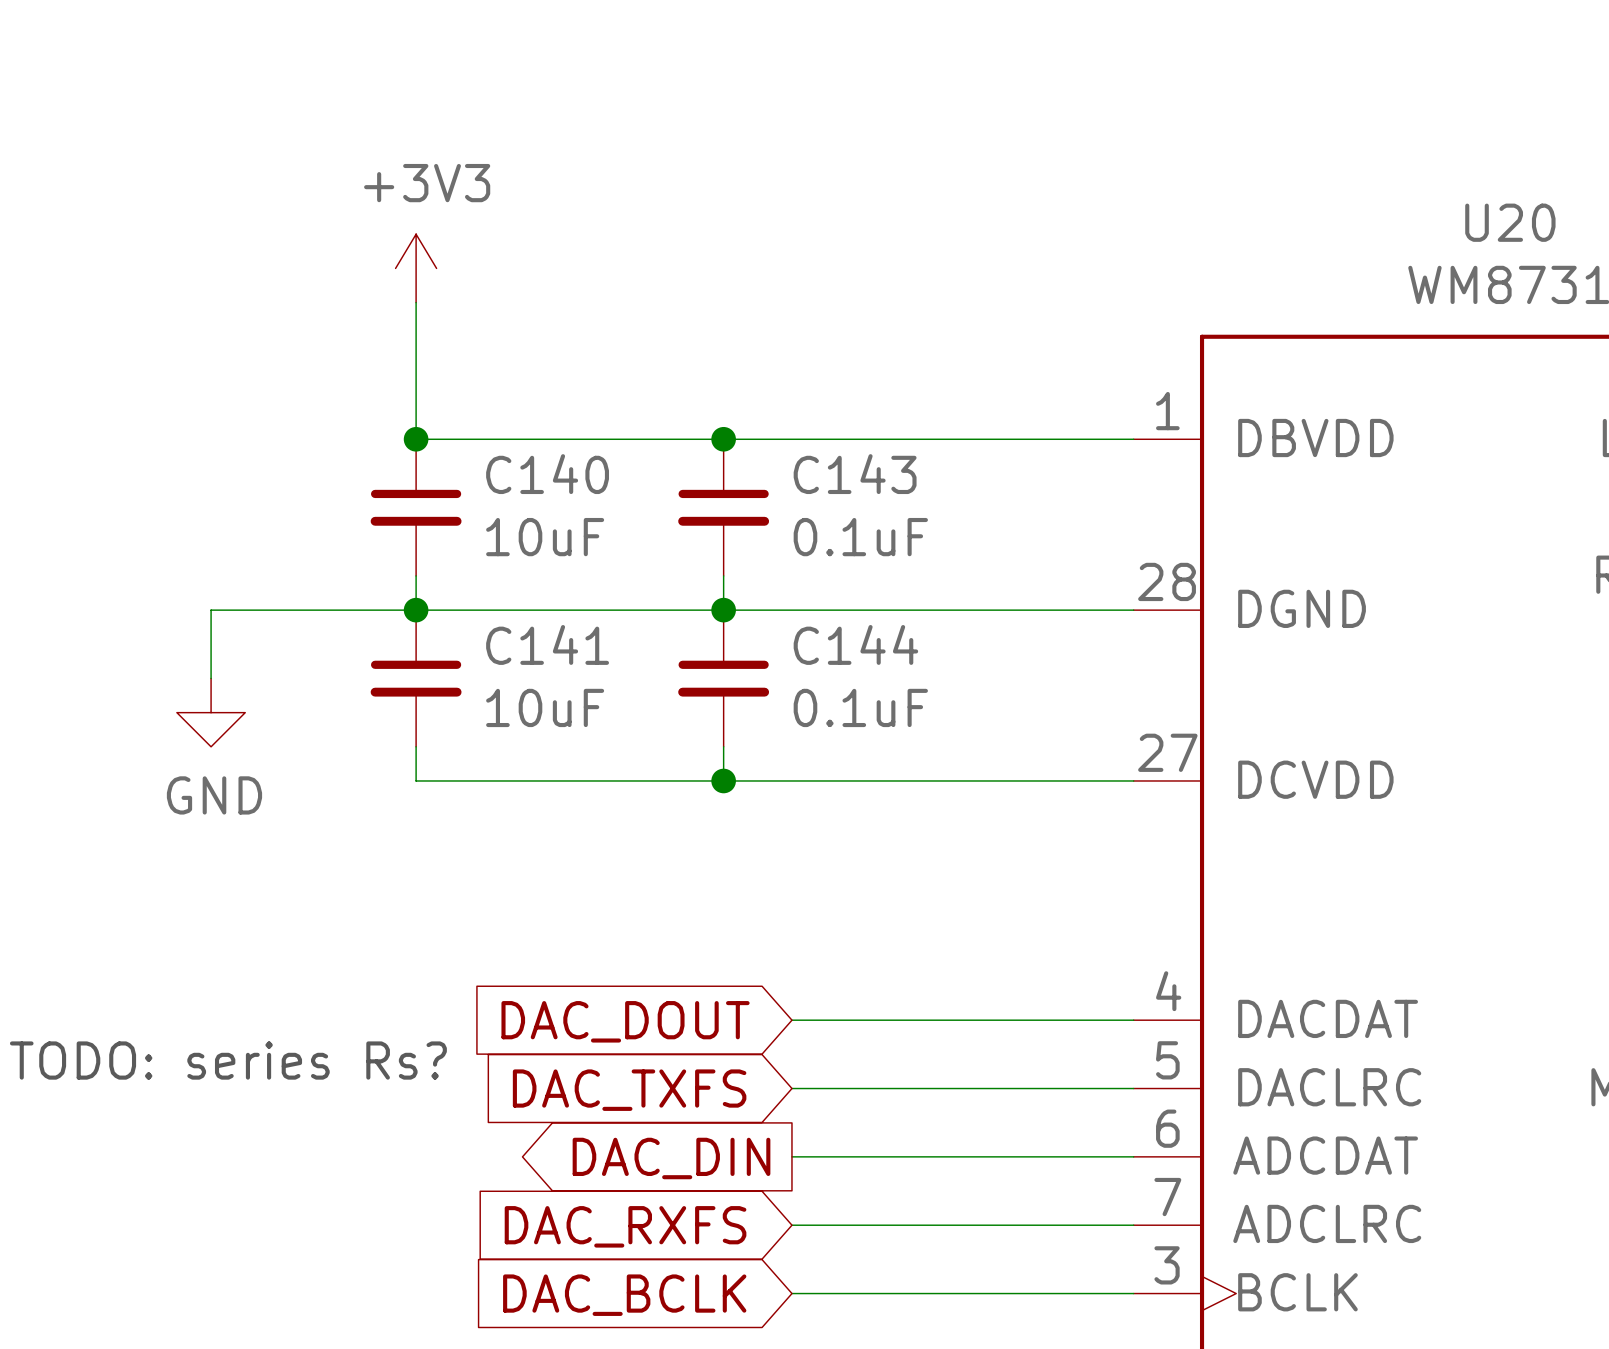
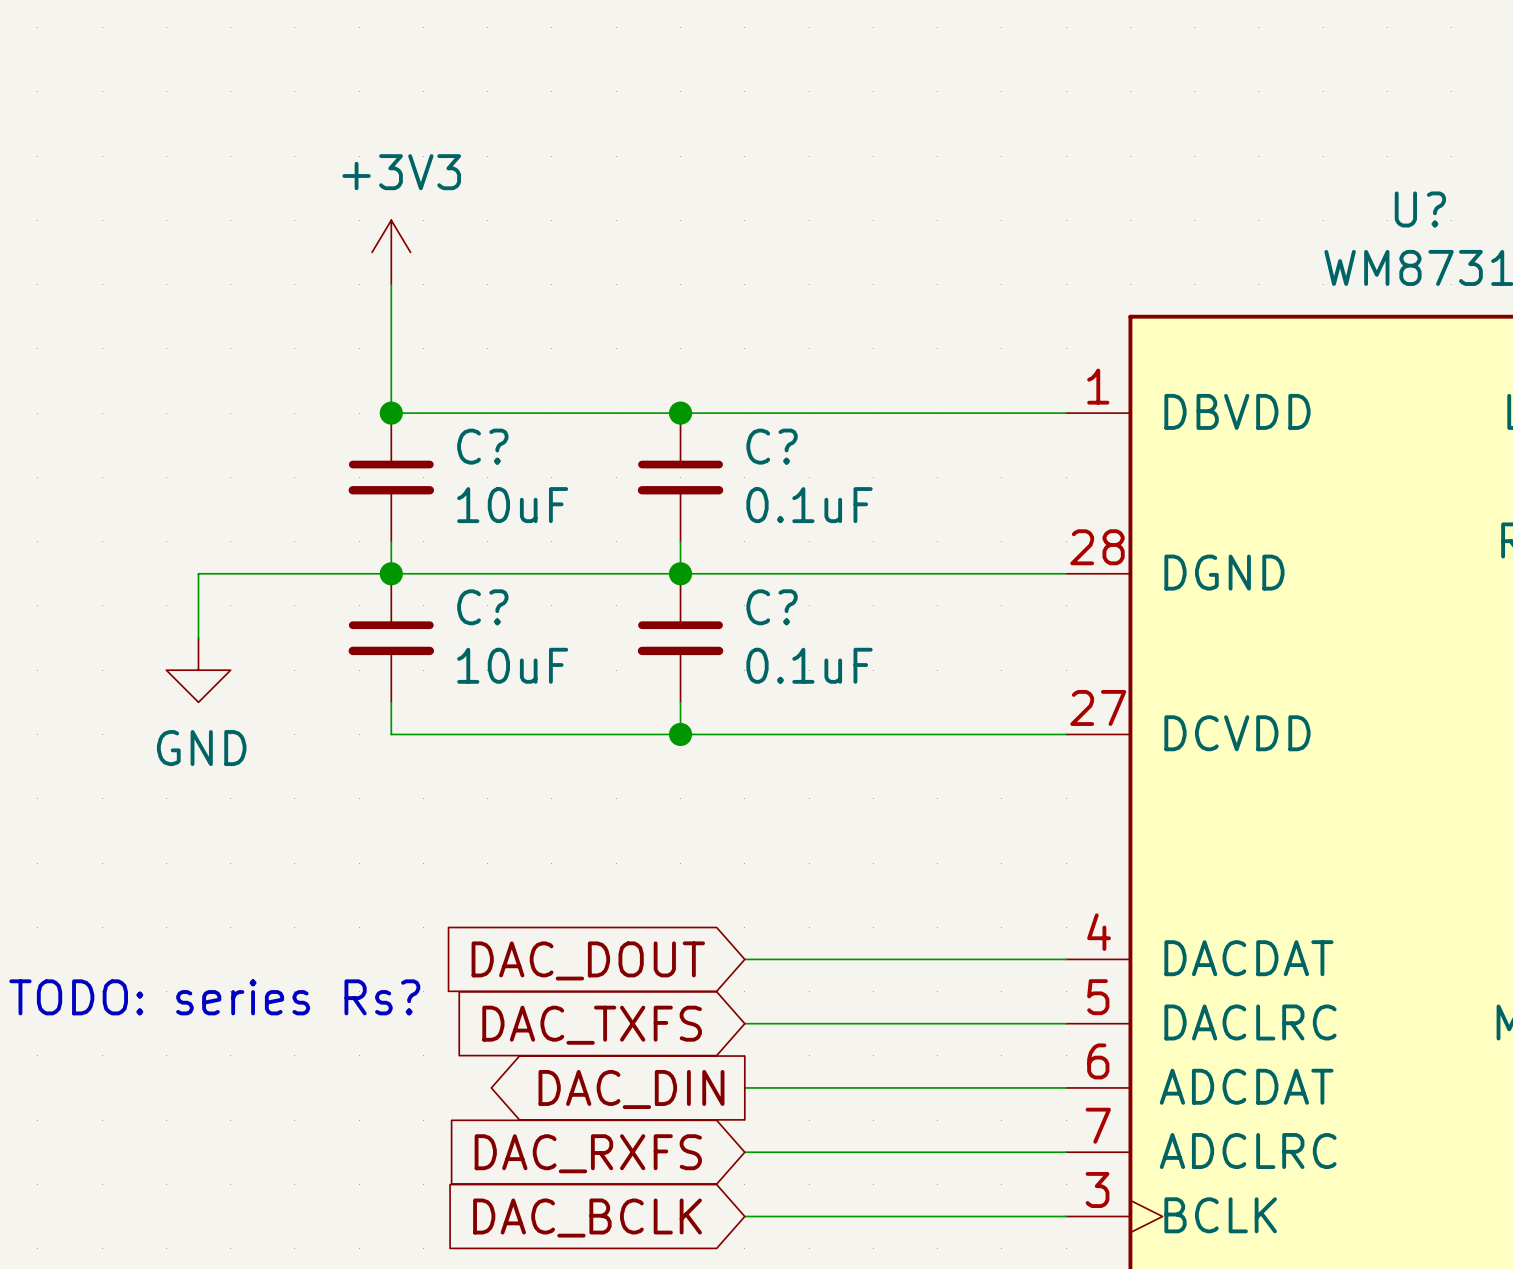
U20 name: U20 (1510, 222) -> U? (1420, 209)
C140 name: C140 (547, 474) -> C? (482, 446)
C143 name: C143 (855, 474) -> C? (772, 446)
C141 name: C141 (547, 644) -> C? (482, 607)
C144 name: C144 (855, 644) -> C? (772, 607)

